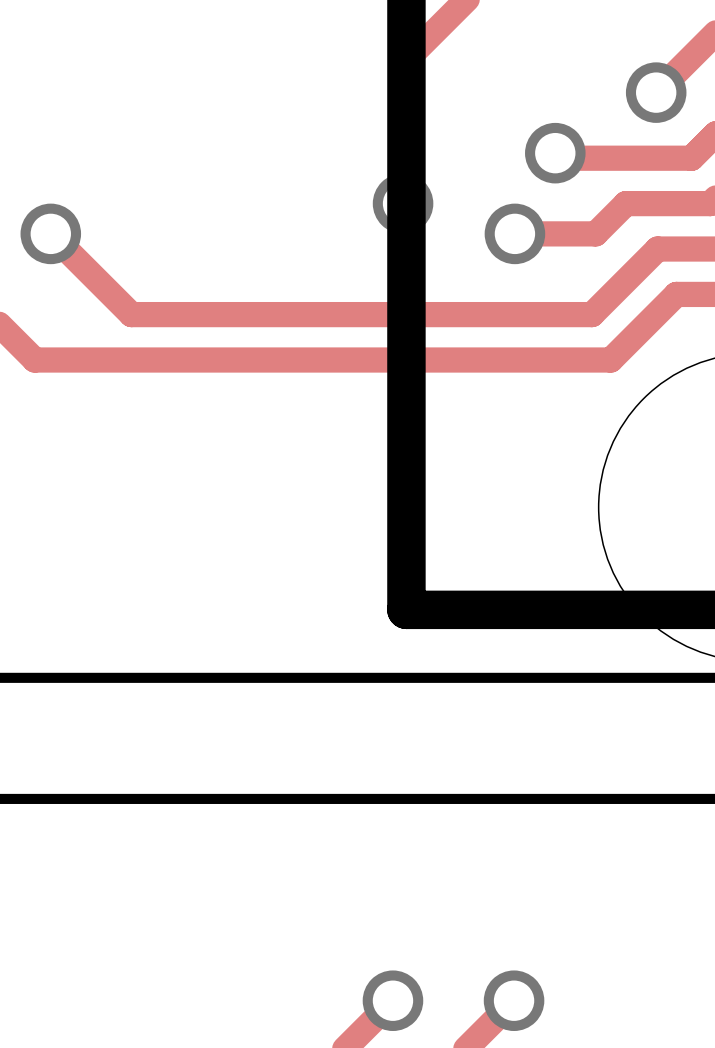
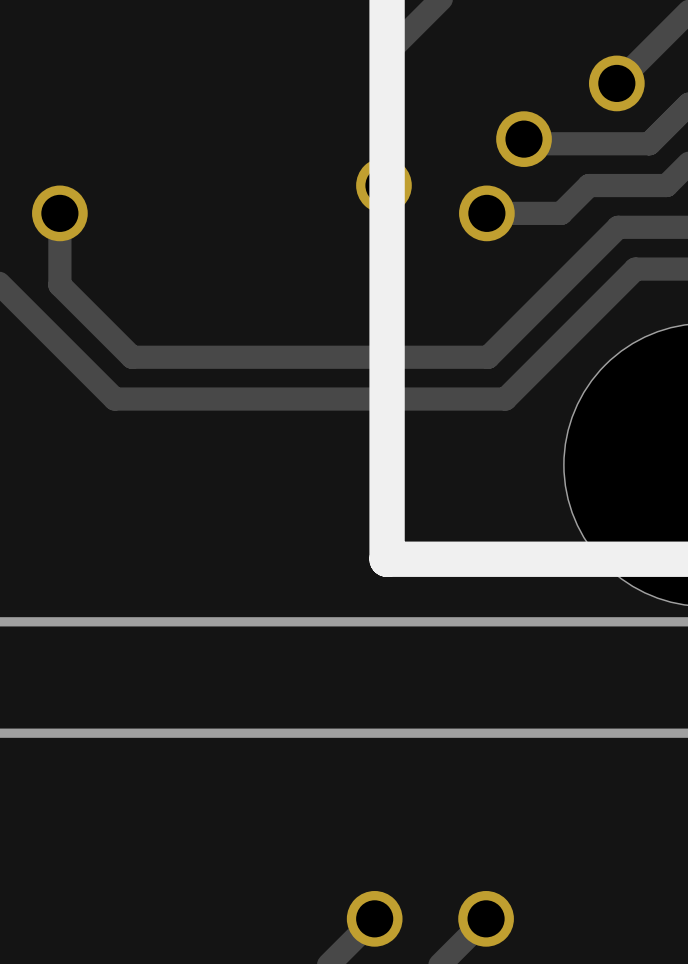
track: (50, 233) (131, 314) (591, 314) -> (59, 213) (59, 285) (132, 357) (488, 357) (557, 287)
track: (34, 360) (610, 360) -> (45, 329) (114, 399) (505, 399) (575, 329)

